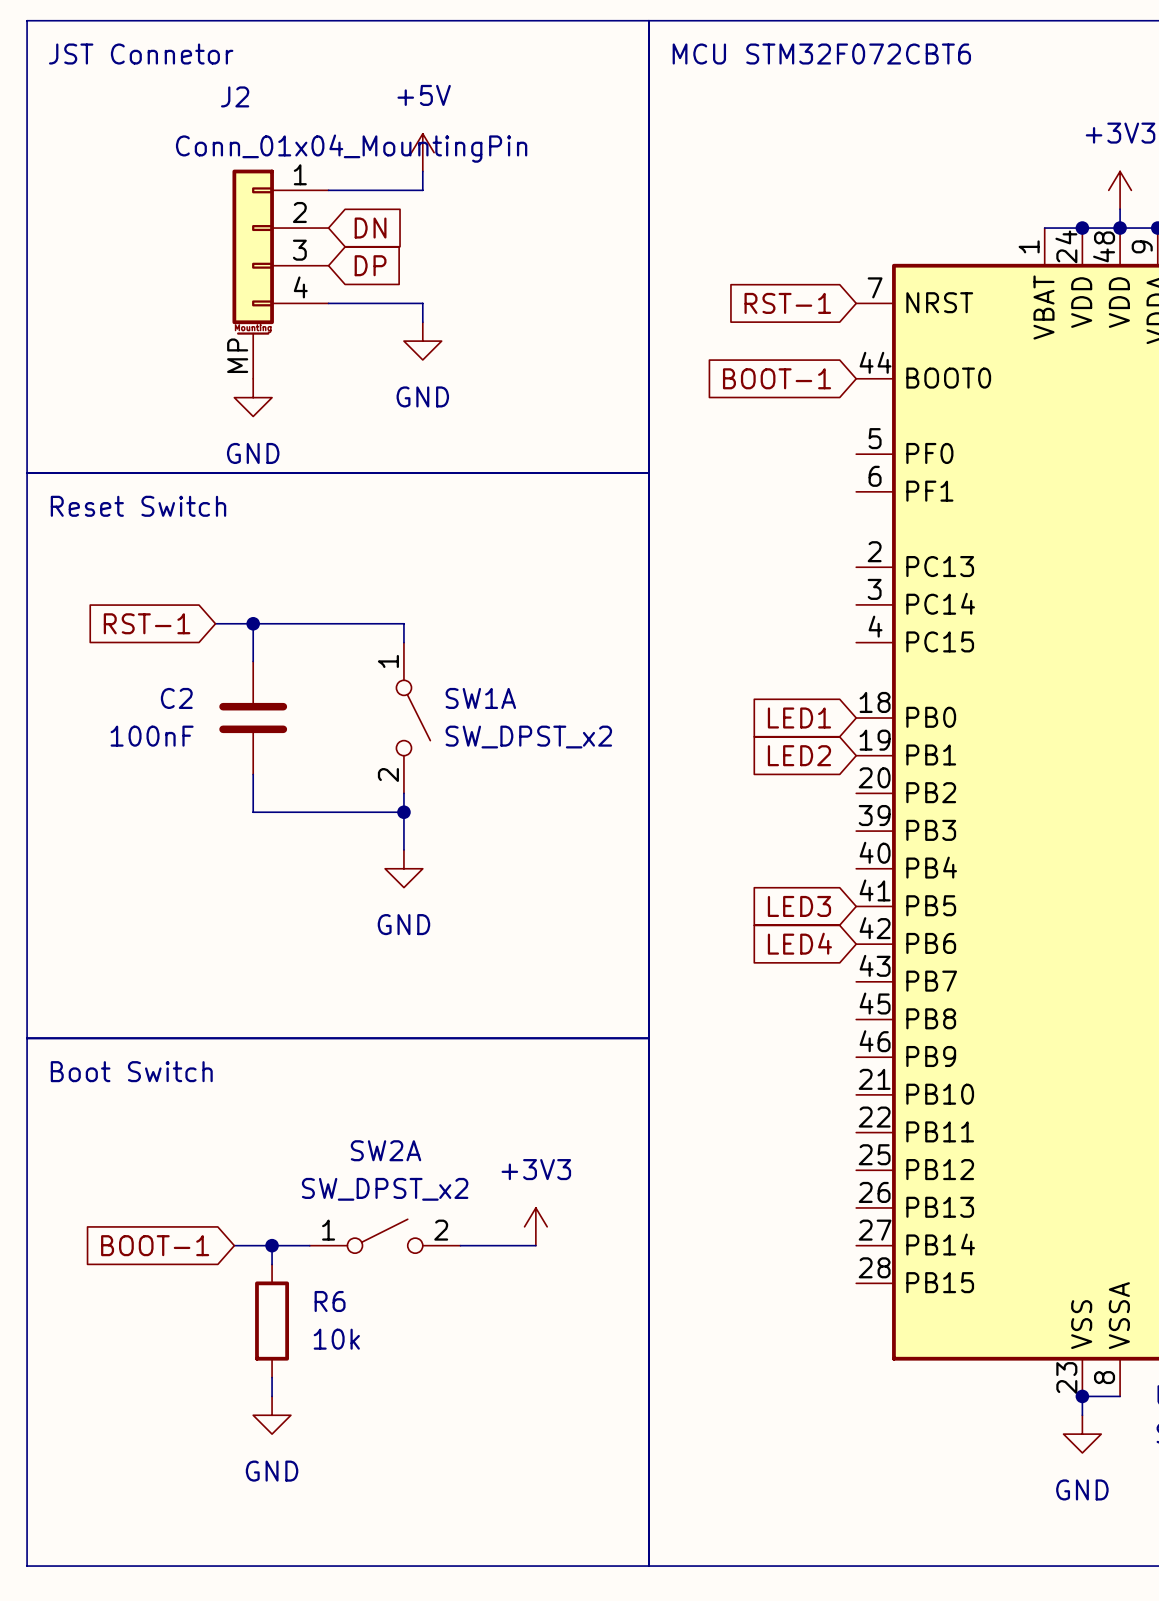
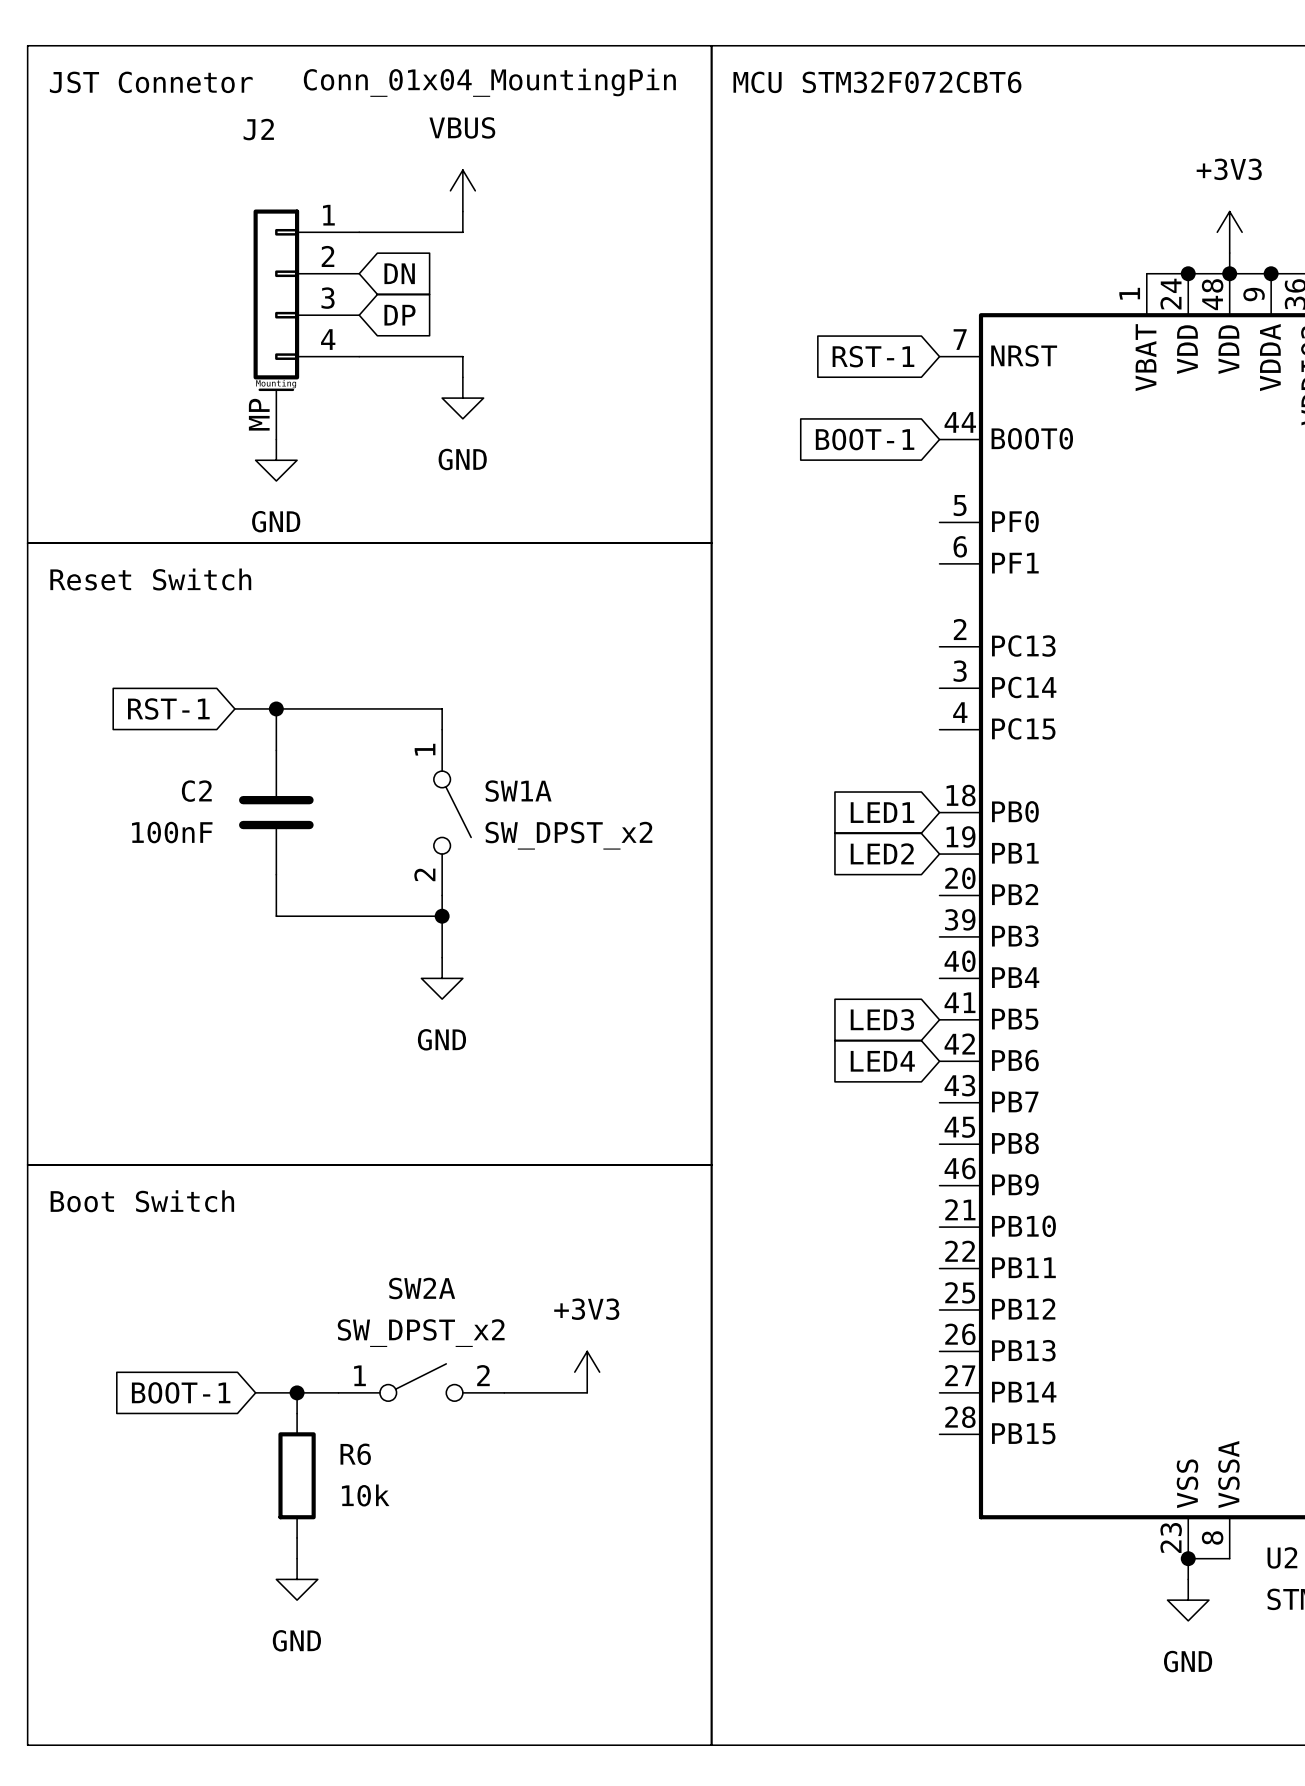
J2 value position: Conn_01x04_MountingPin (351, 148) -> Conn_01x04_MountingPin (489, 82)
power symbol: +5V (422, 152) -> VBUS (462, 190)

